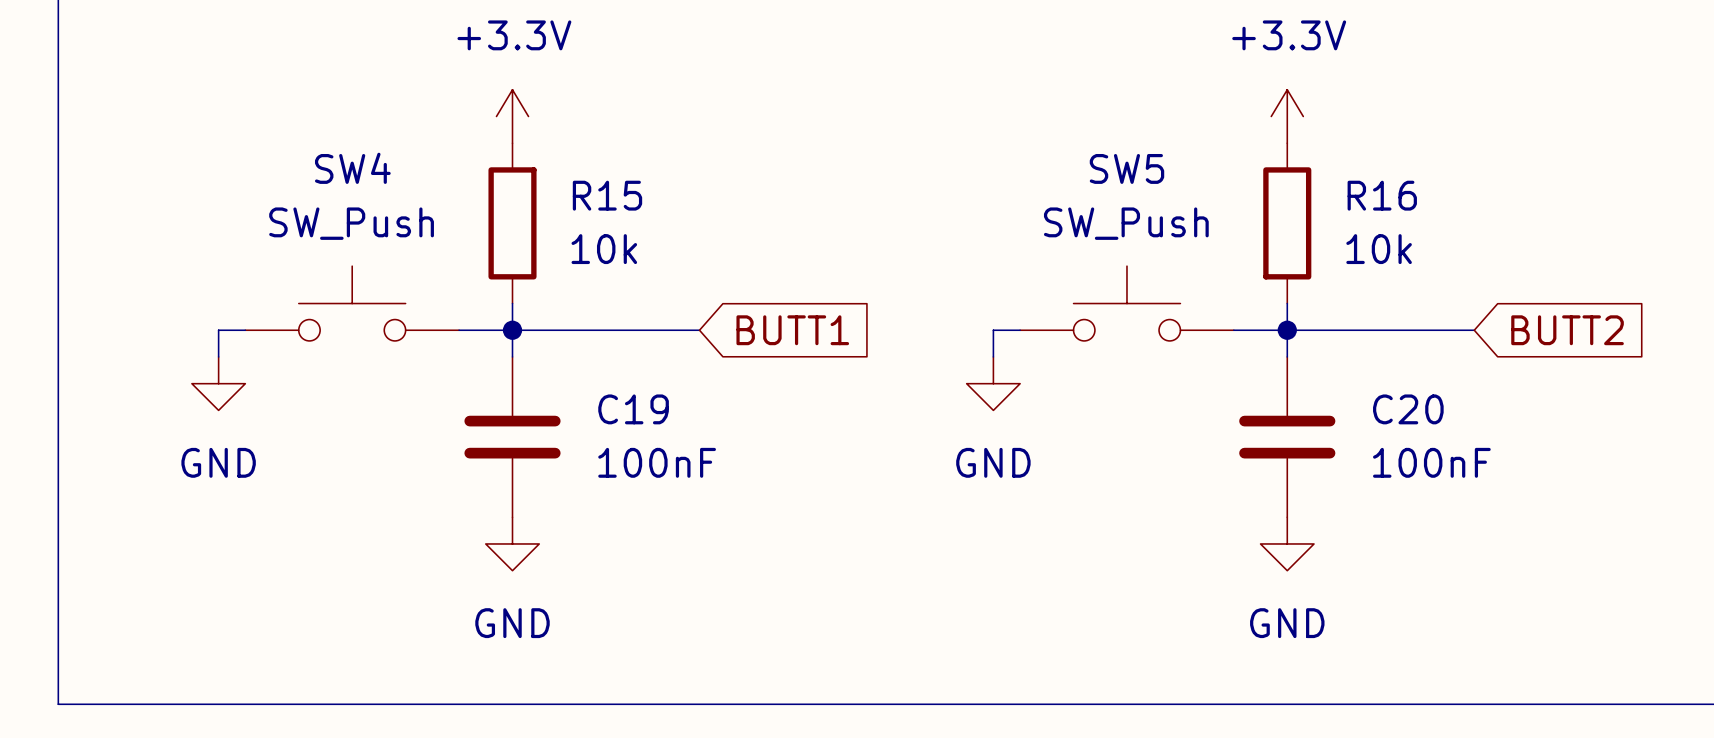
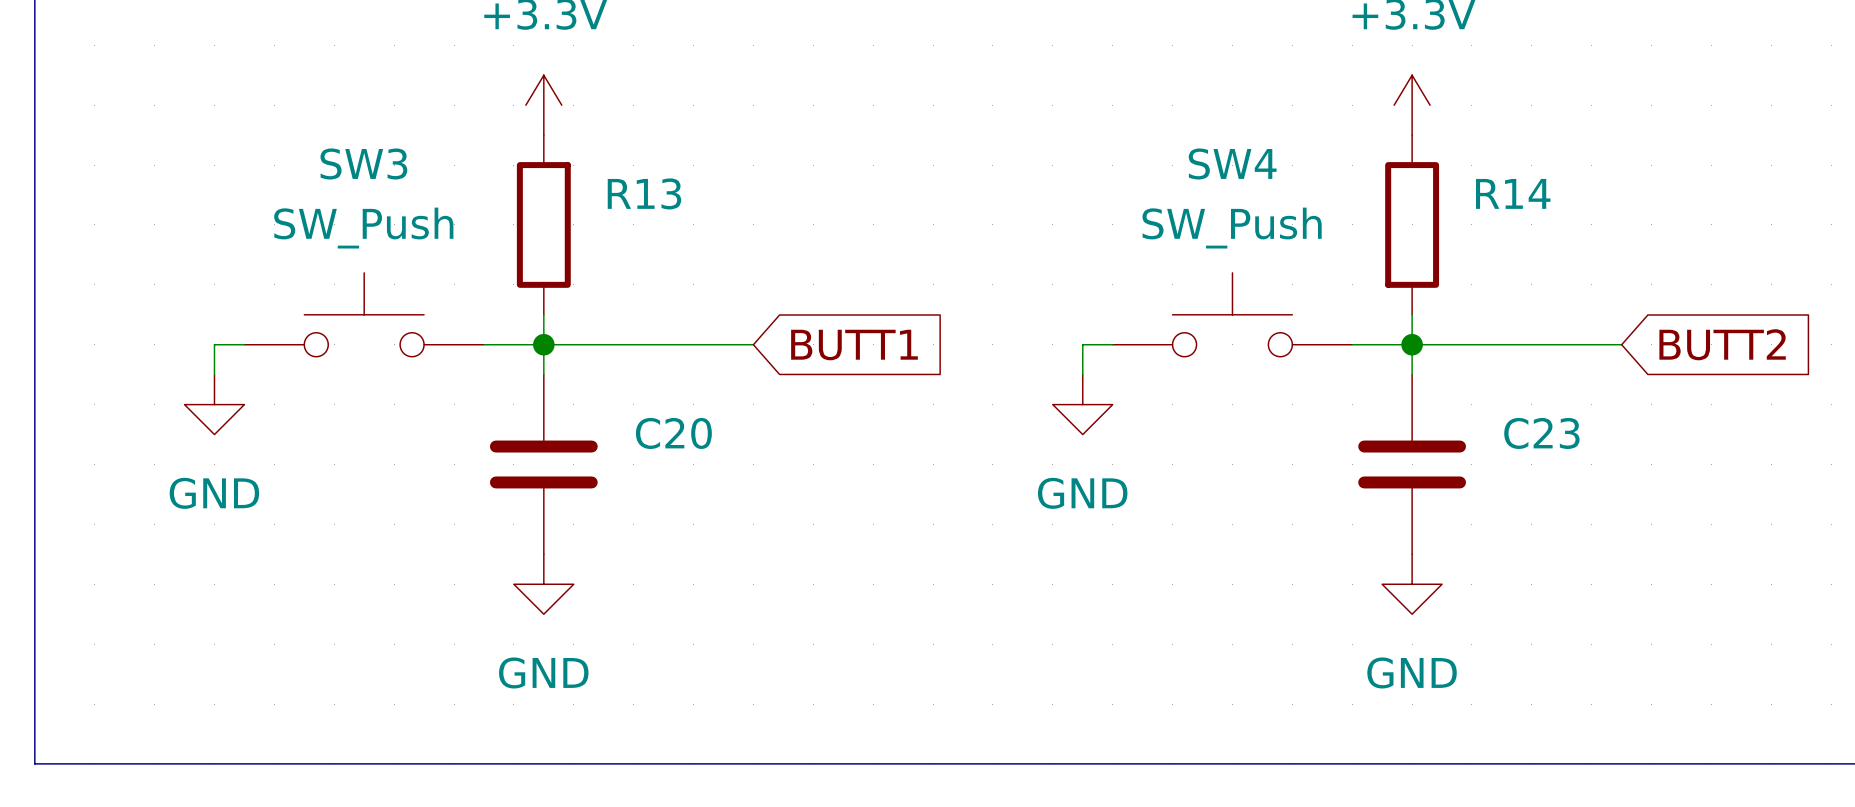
SW4 name: SW4 (352, 168) -> SW3 (363, 163)
SW5 name: SW5 (1126, 168) -> SW4 (1232, 163)
R15 name: R15 (607, 195) -> R13 (644, 193)
R16 name: R16 (1382, 195) -> R14 (1513, 193)
R15 value: 10k (604, 249) -> none
R16 value: 10k (1379, 249) -> none
C19 name: C19 (633, 409) -> C20 (673, 433)
C20 name: C20 (1408, 409) -> C23 (1541, 433)
C19 value: 100nF (657, 462) -> none
C20 value: 100nF (1431, 462) -> none

